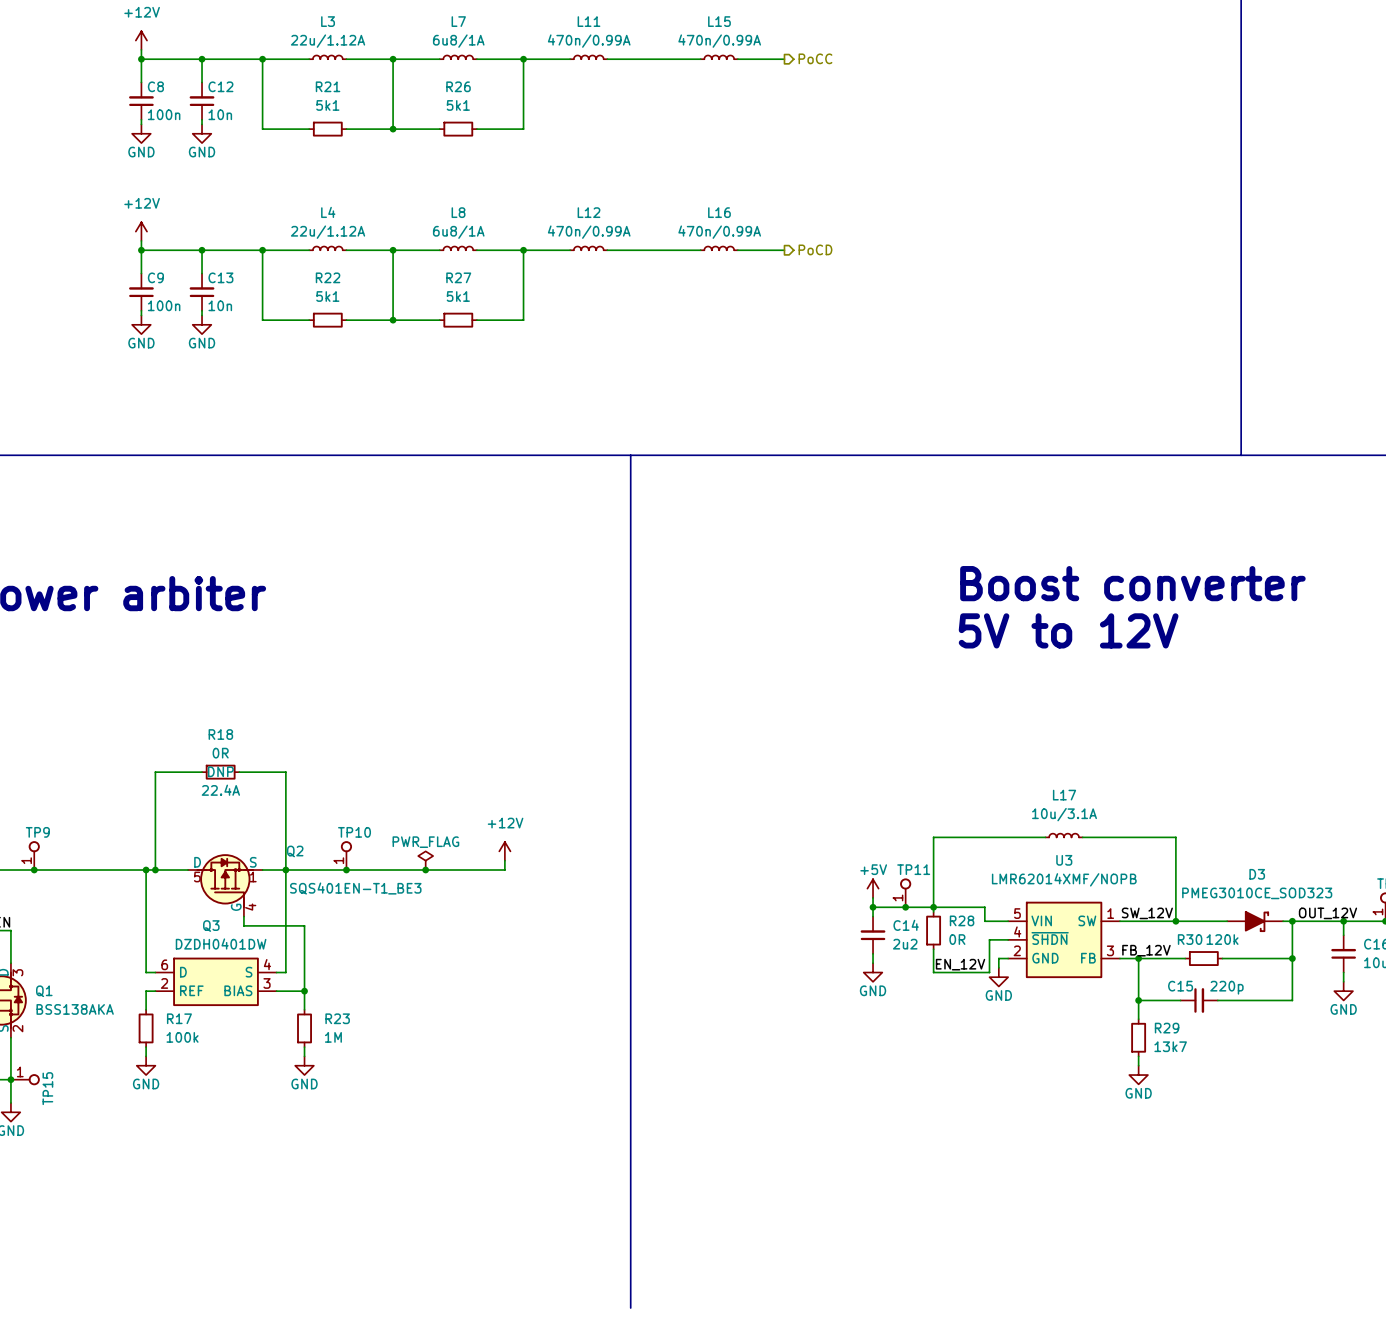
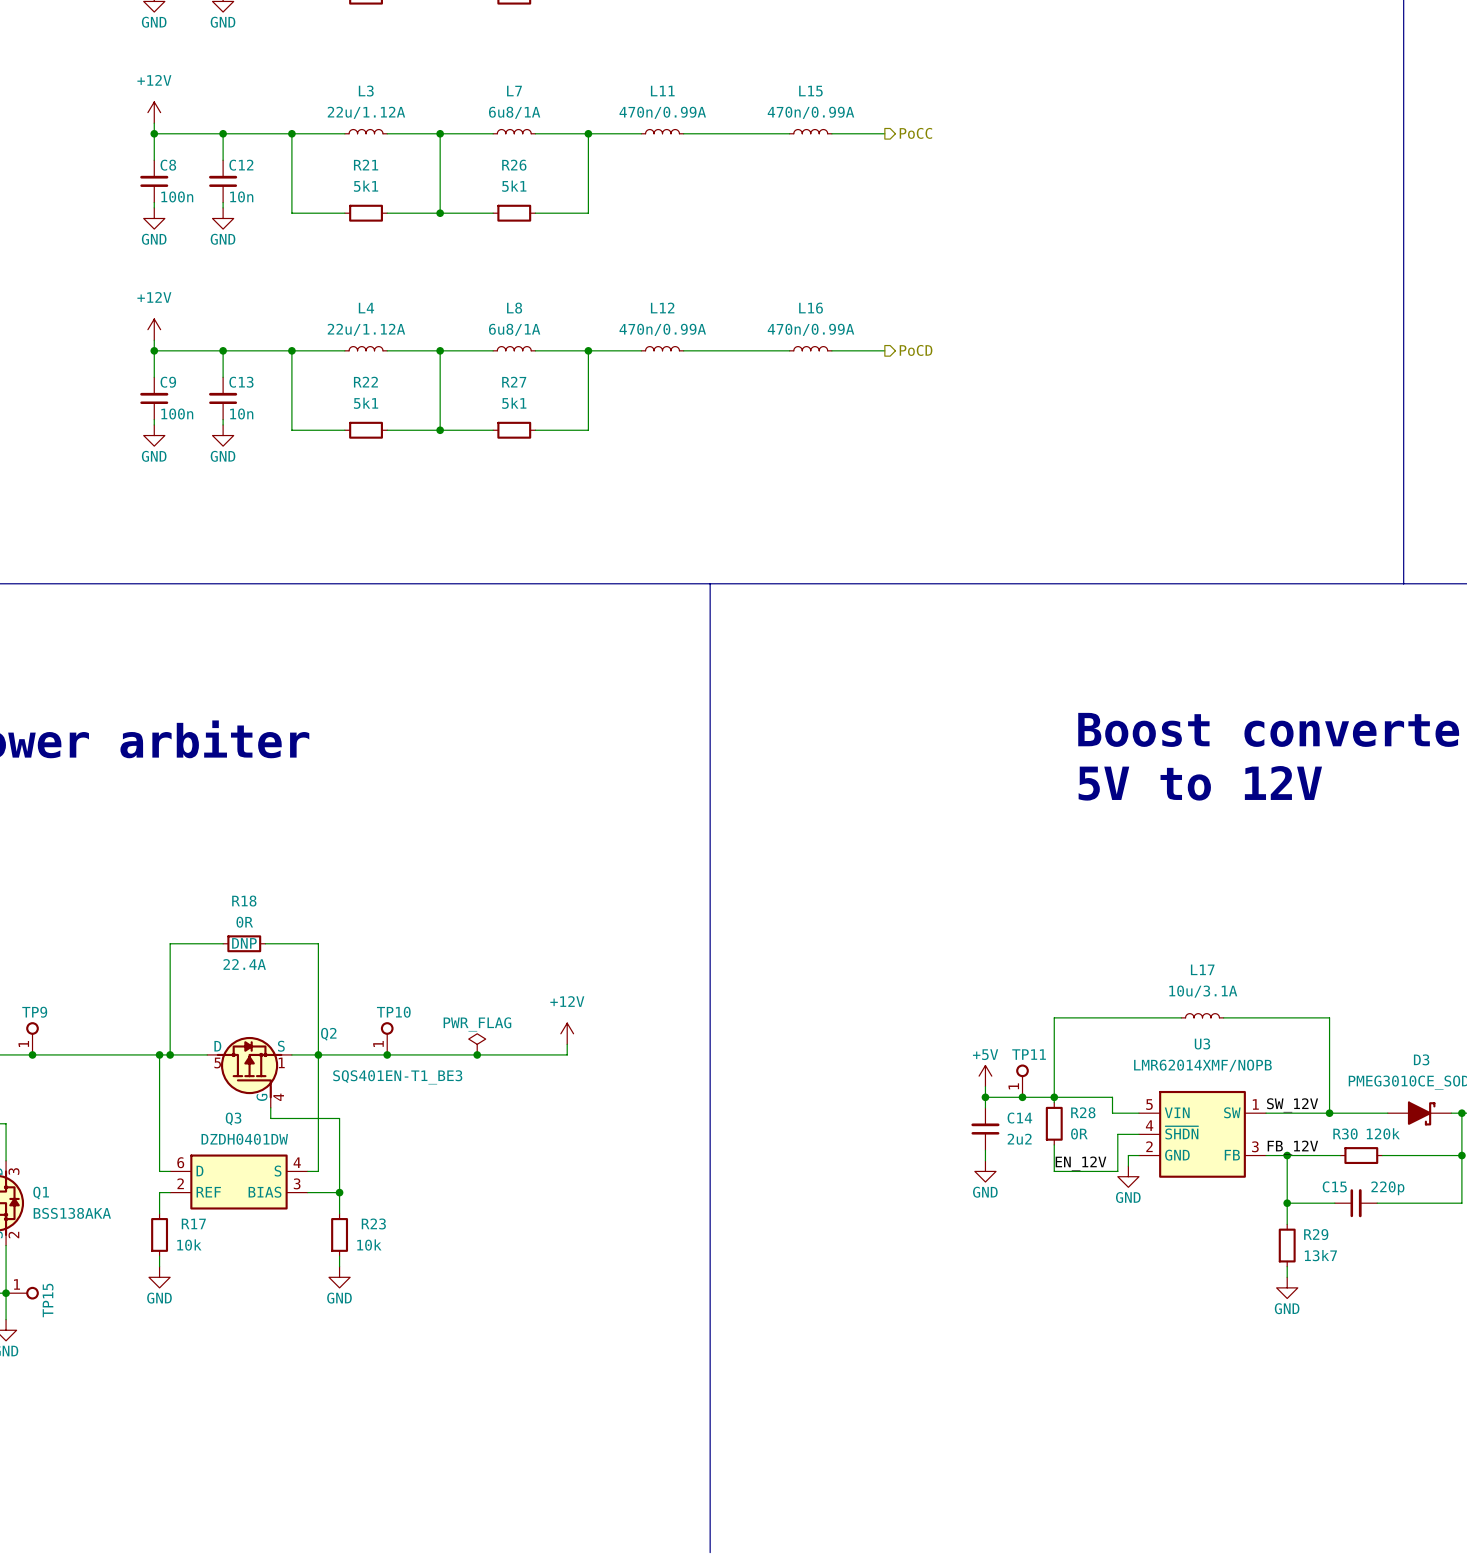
R17 text: 100k (182, 1037) -> 10k (189, 1245)
R23 text: 1M (333, 1037) -> 10k (369, 1245)

